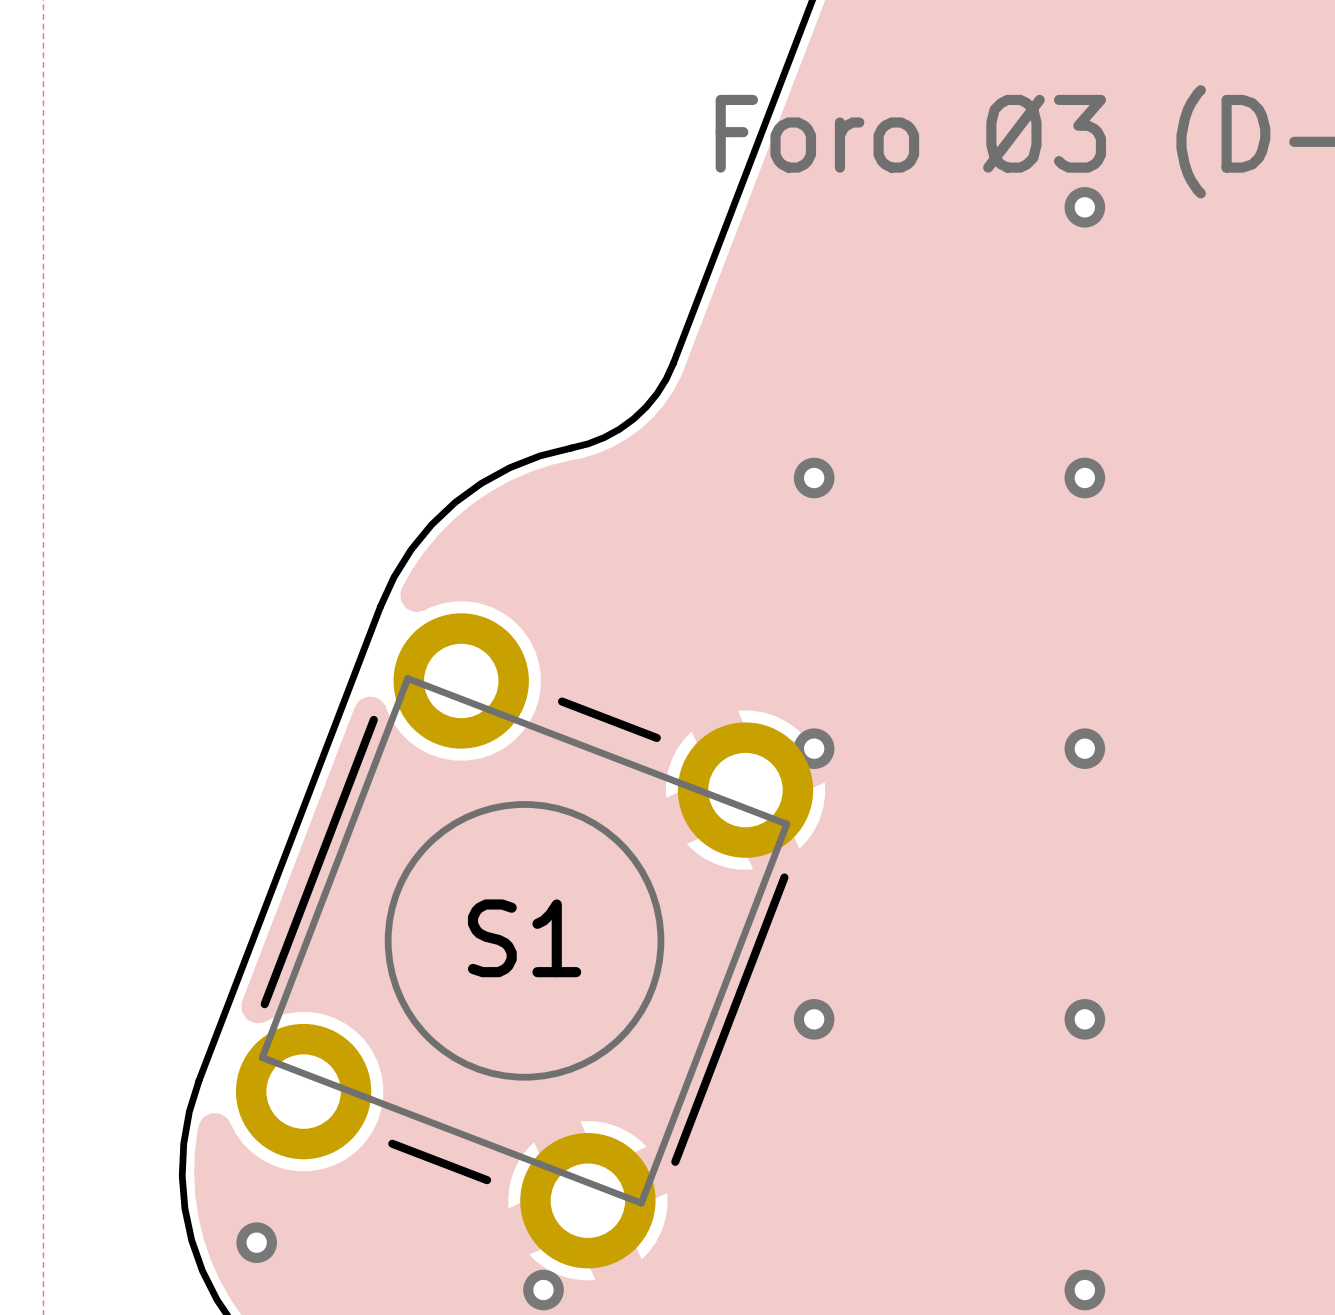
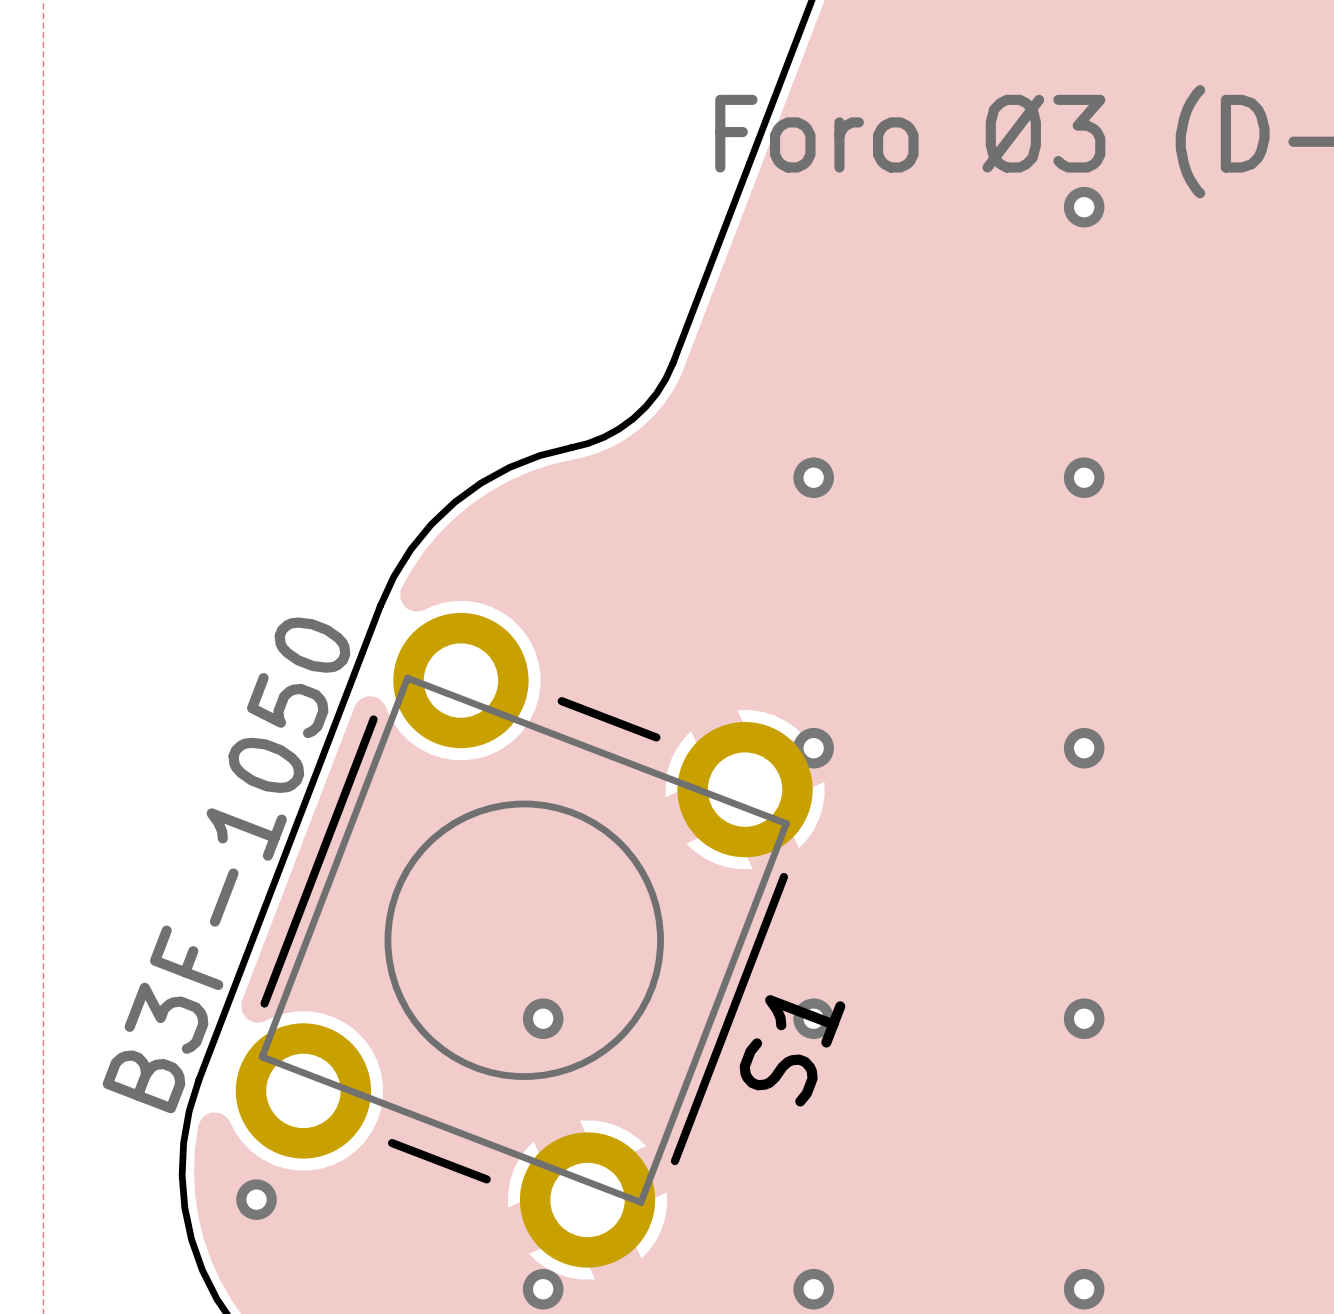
S1 value: none -> B3F-1050 (226, 865)
S1 name rotation: 0° (524, 938) -> 69° counterclockwise (792, 1050)
S1 name position: S1 (524, 938) -> S1 (792, 1050)
via: none -> (543, 1018)
via position: (256, 1242) -> (256, 1199)
via: none -> (813, 1289)

